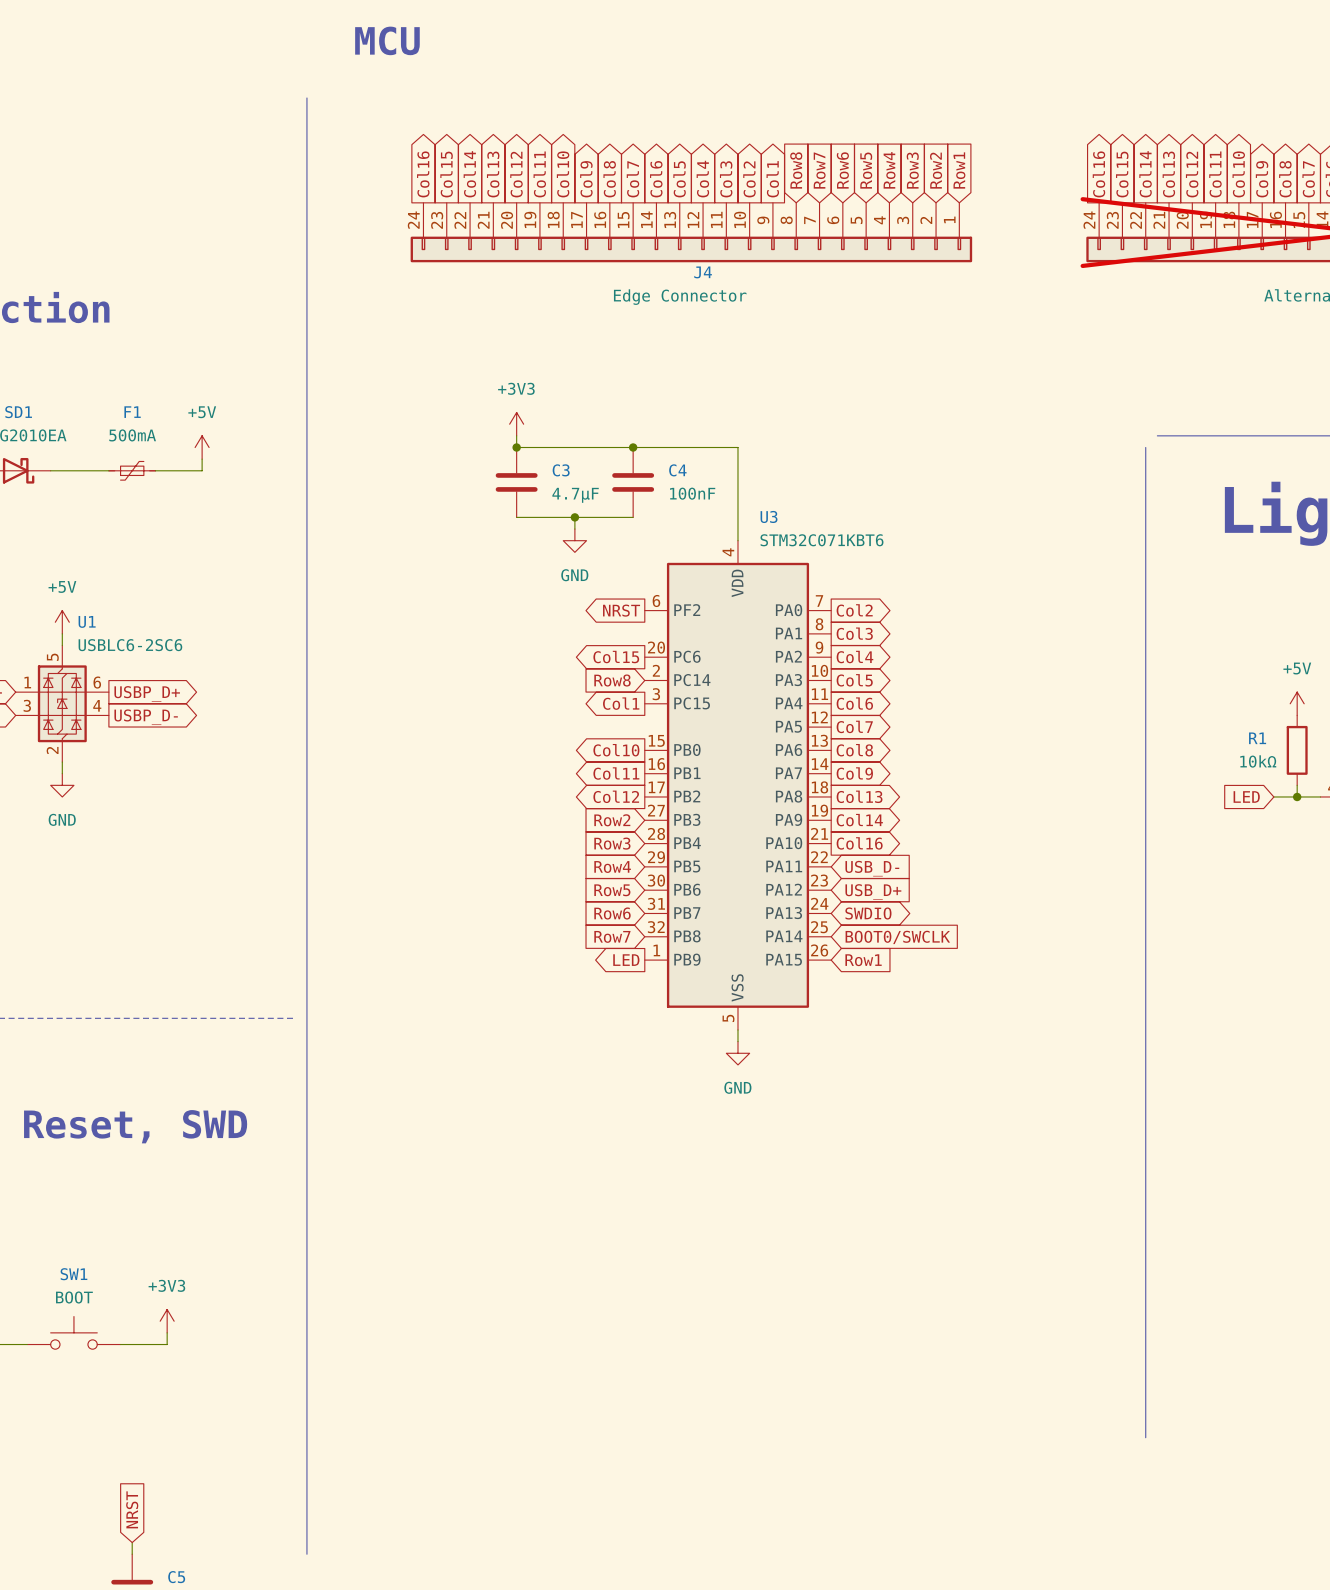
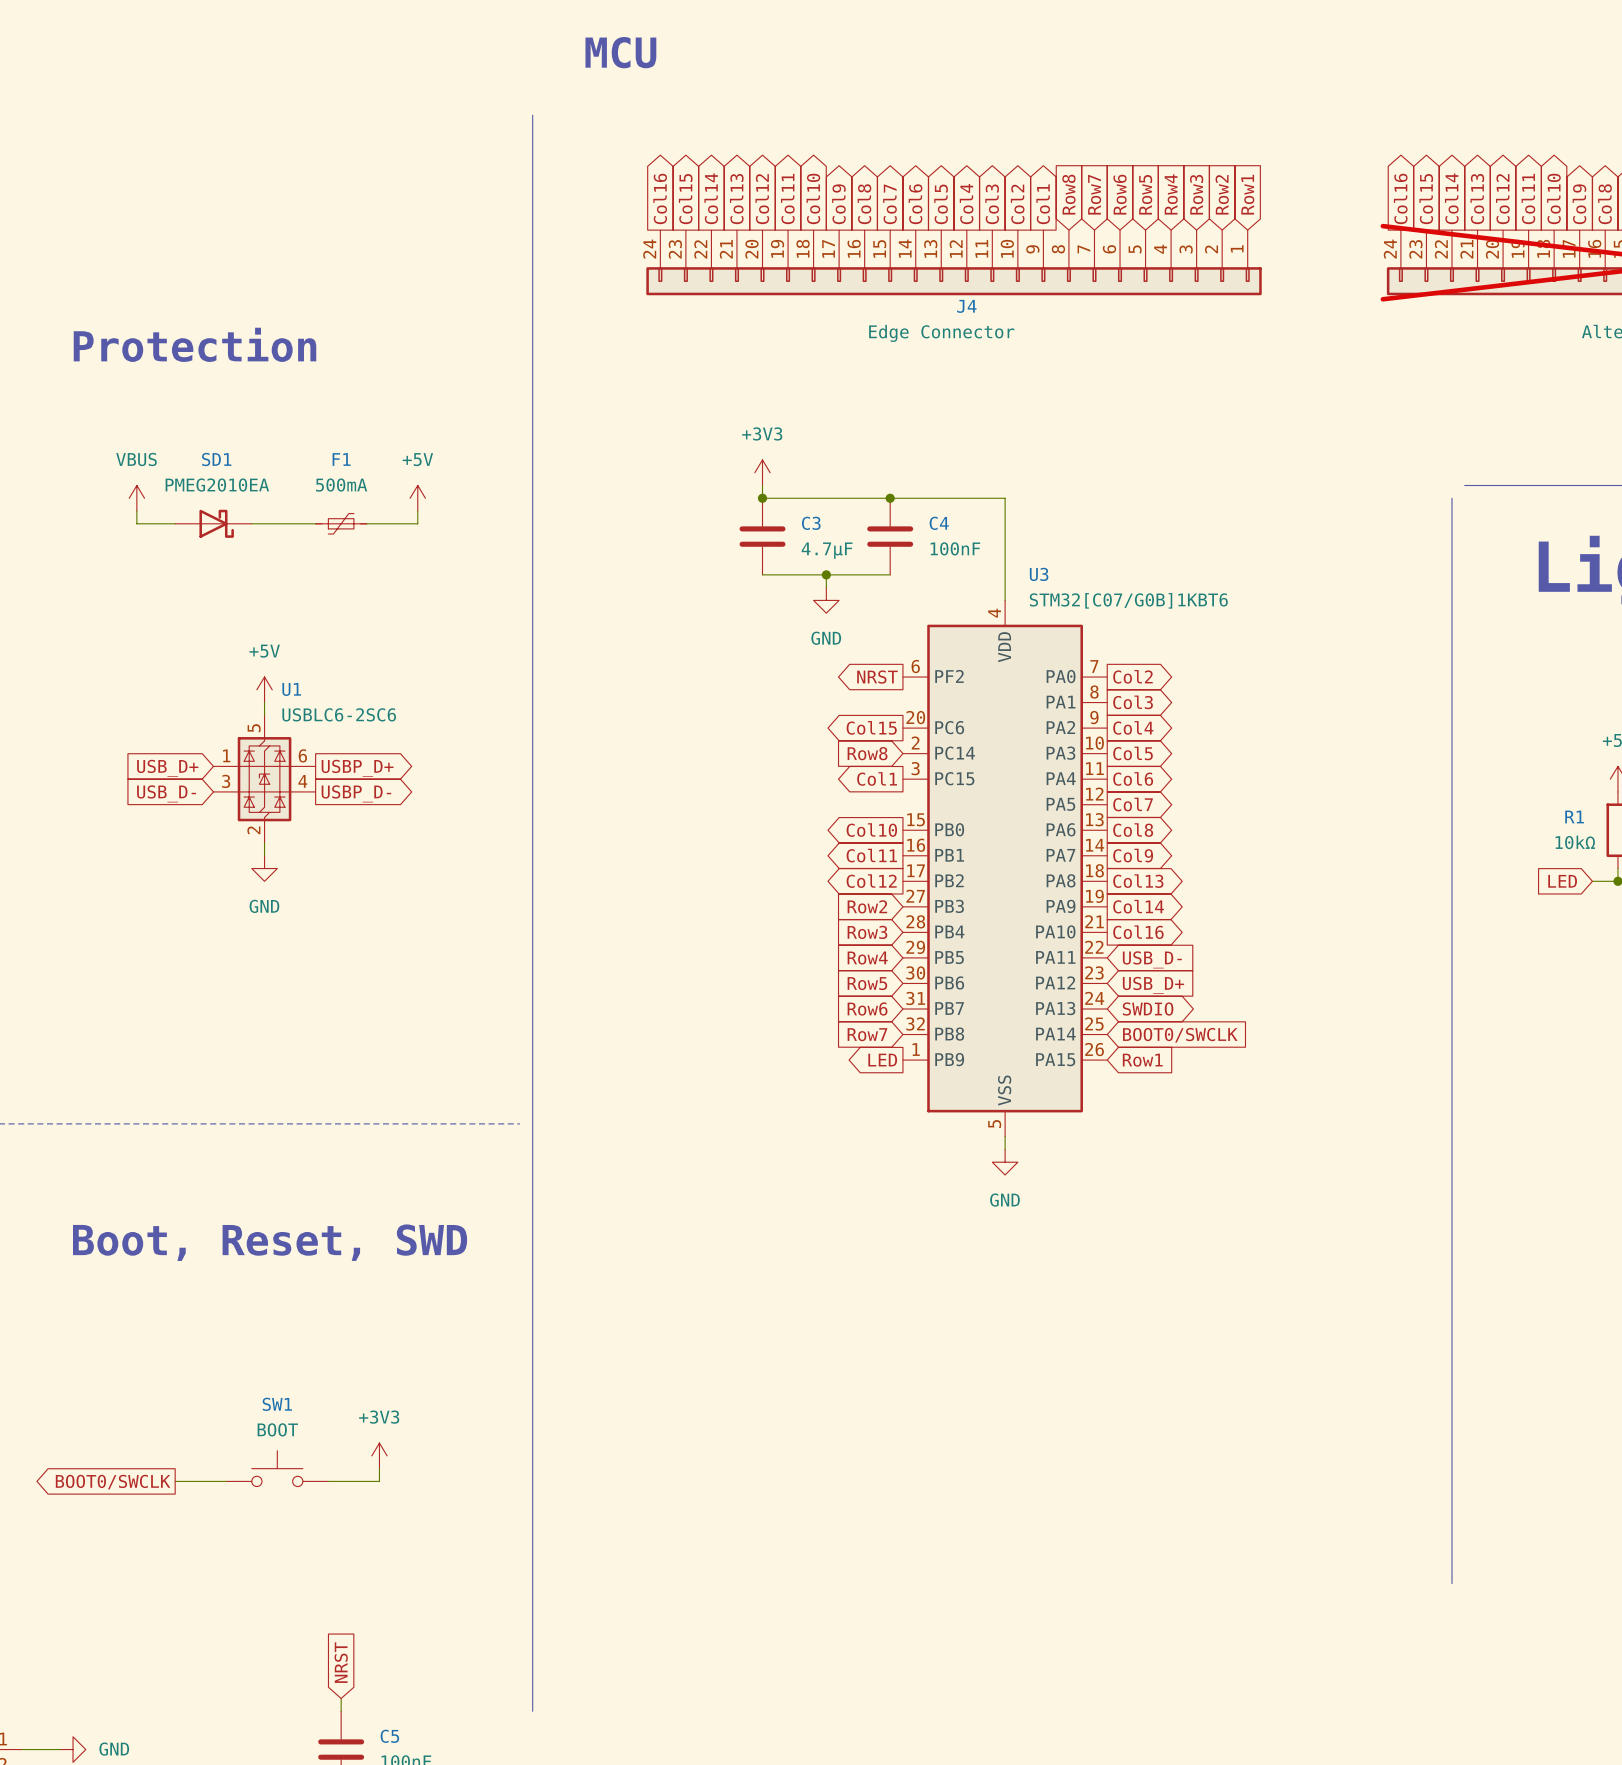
U3 value: STM32C071KBT6 (821, 540) -> STM32[C07/G0B]1KBT6 (1128, 600)

